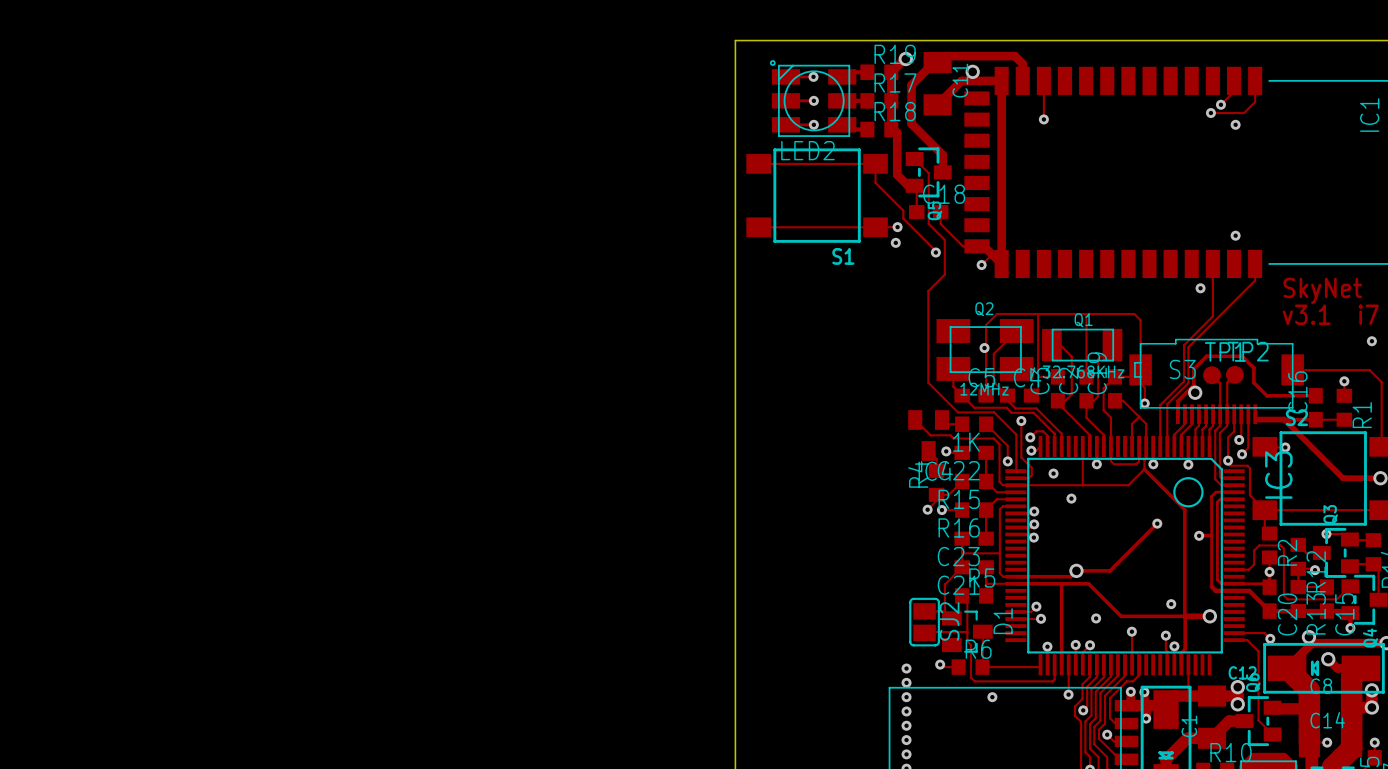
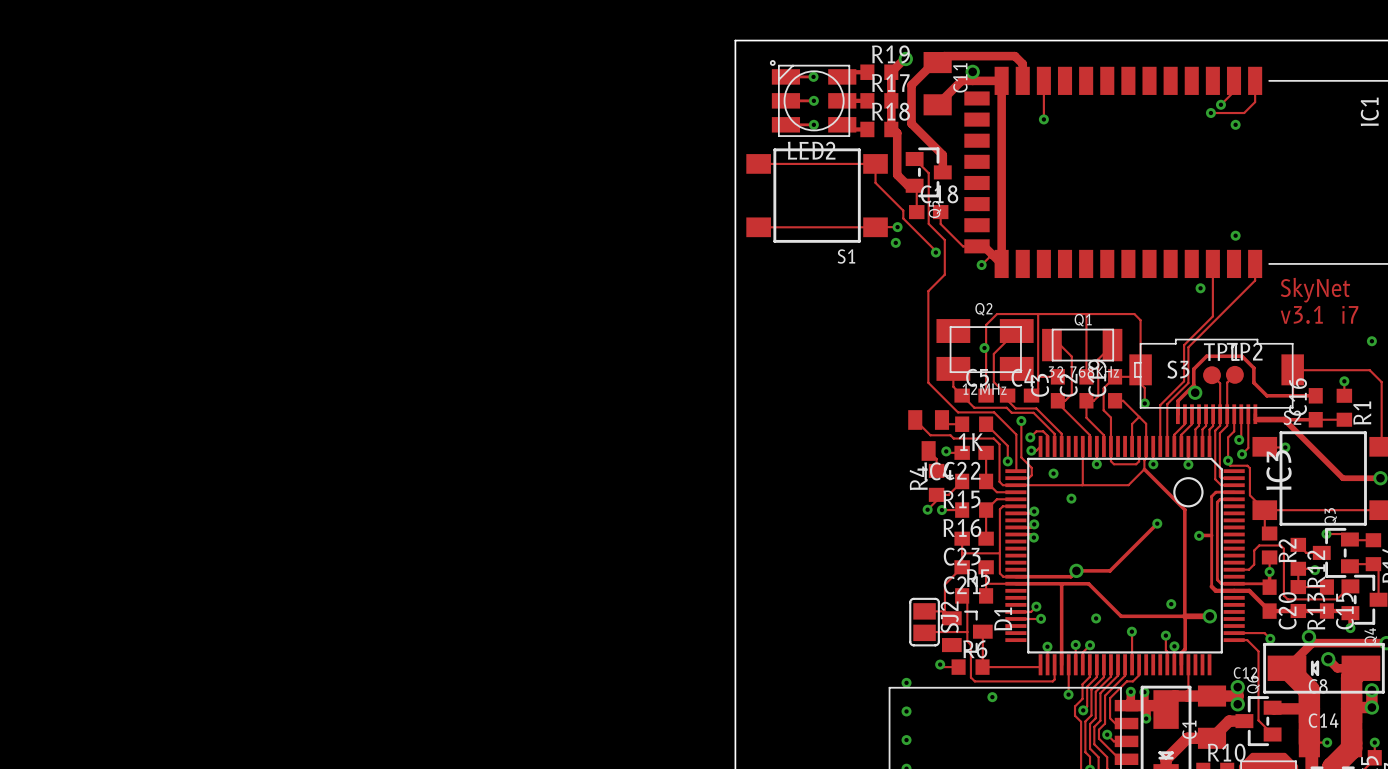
via: (906, 668) -> none
via: (906, 697) -> none
via: (906, 725) -> none
via: (906, 754) -> none

